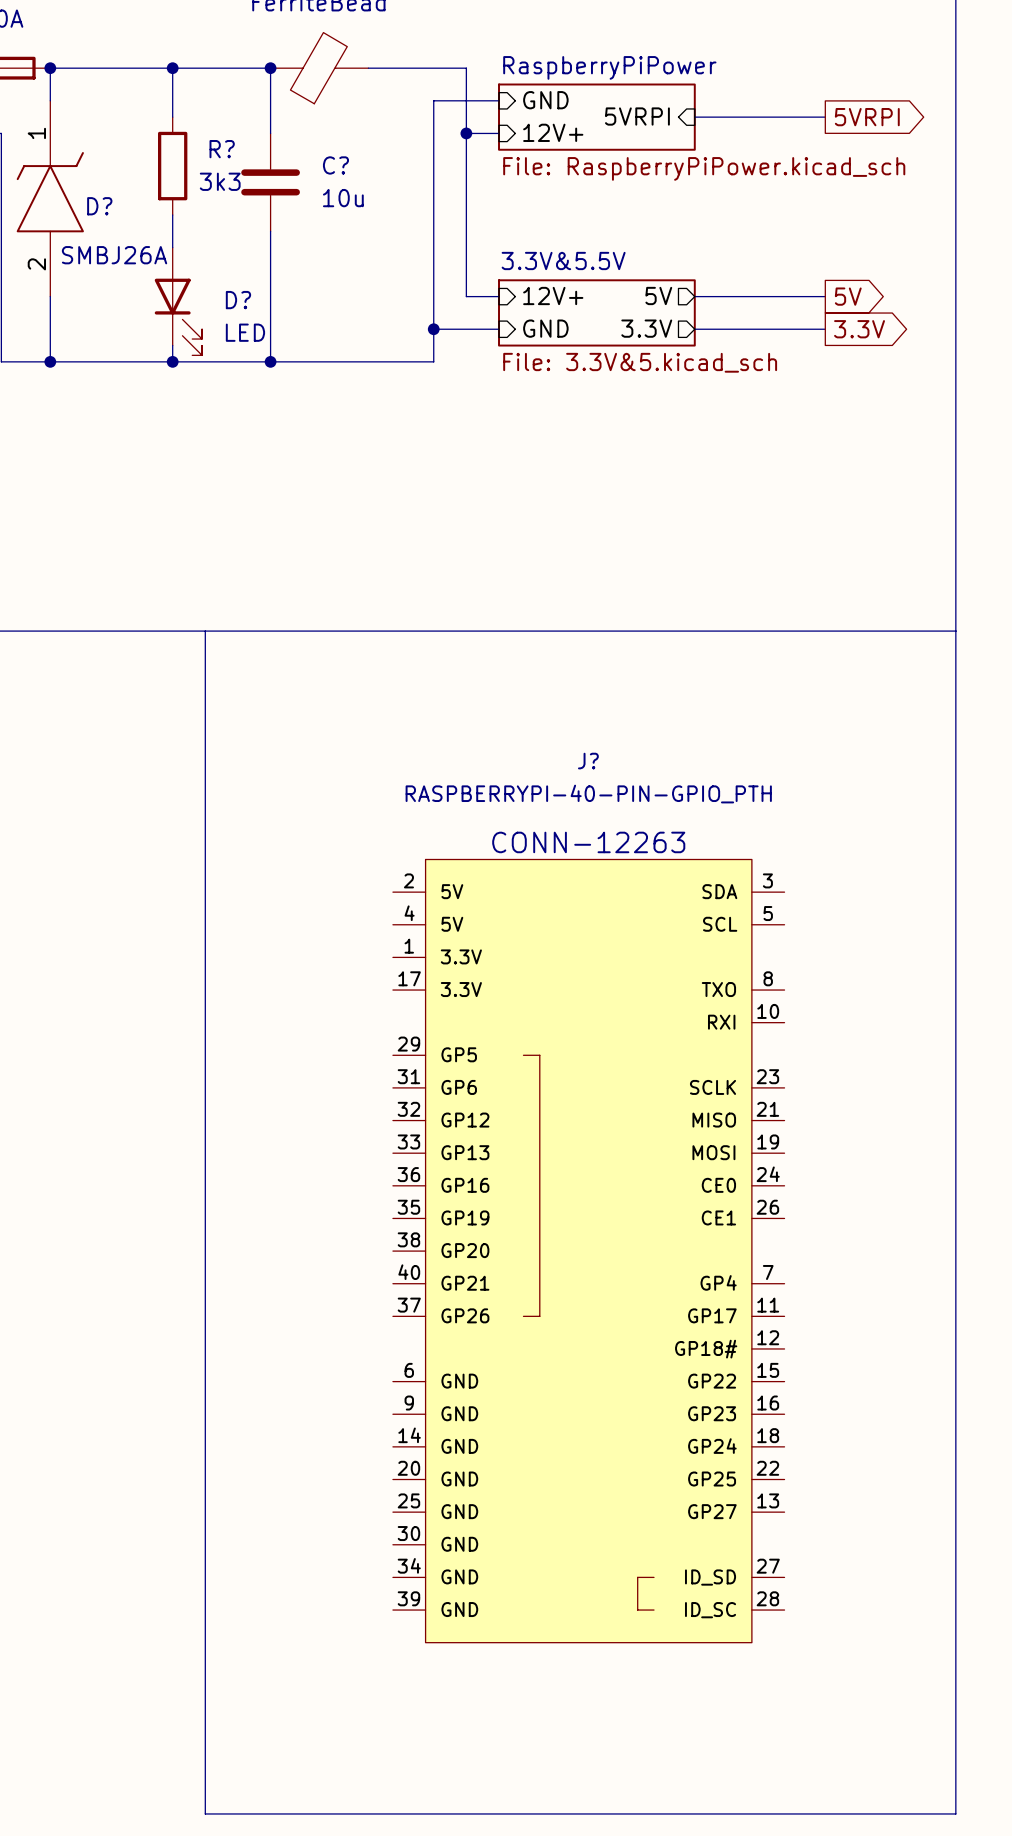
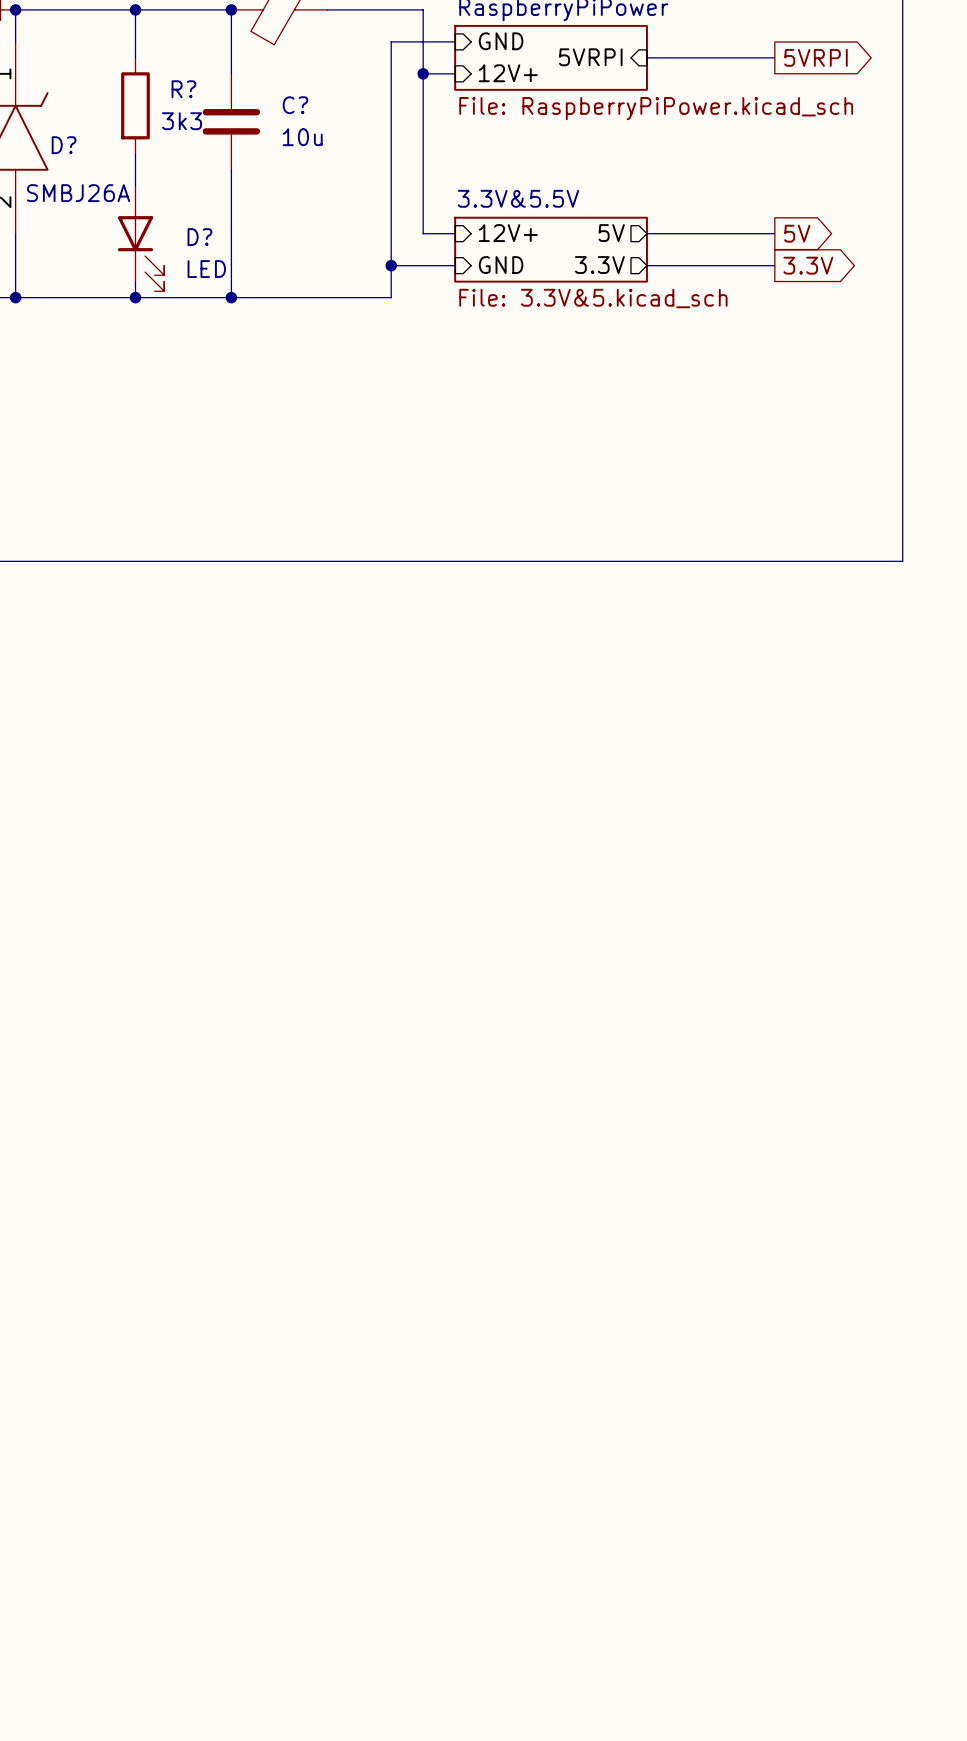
line: (205, 631) (205, 1813) (955, 1813) (955, 631) -> none
J?: RASPBERRYPI-40-PIN-GPIO_PTH (588, 1251) -> none

